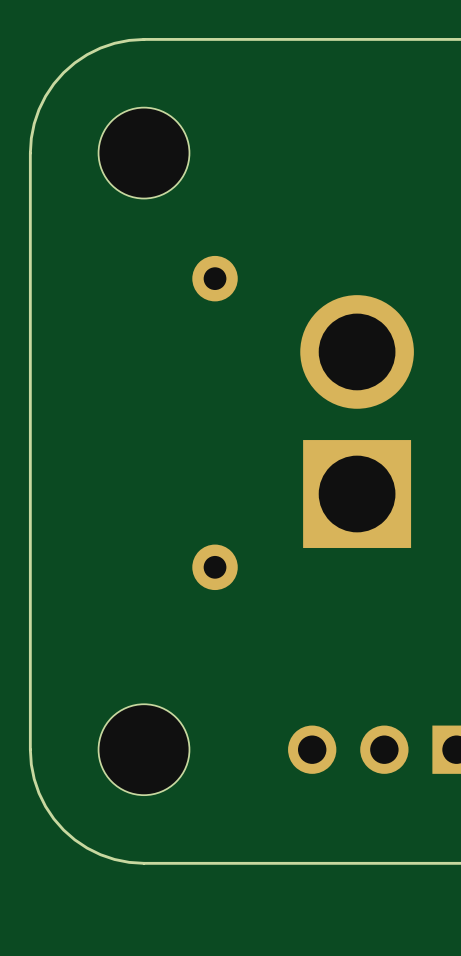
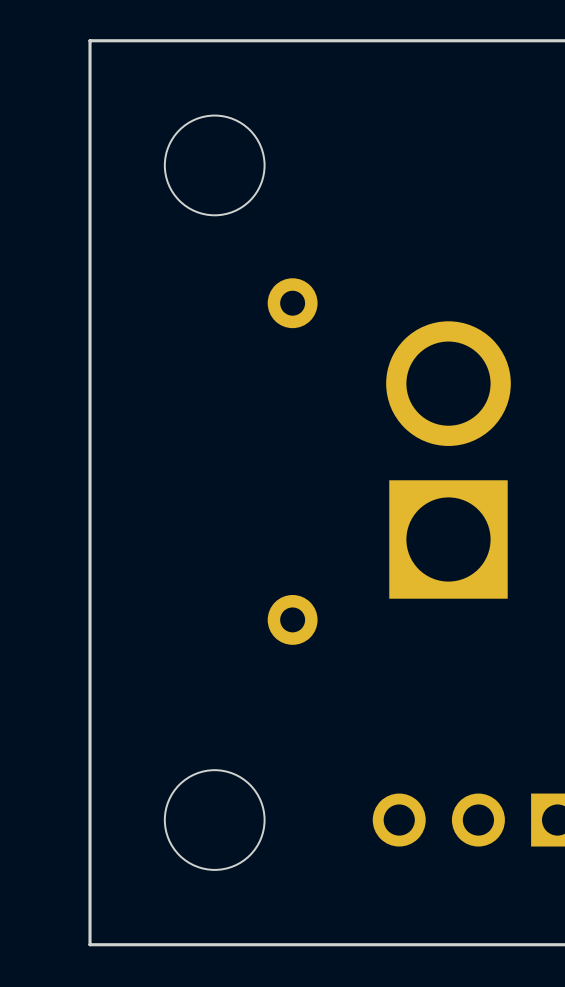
board edge: (144, 39) (114, 43) (100, 48) (74, 62) (63, 72) (53, 83) (39, 109) (34, 123) (30, 153) -> (214, 40) (90, 40) (90, 165)
board edge: (30, 749) (34, 779) (39, 793) (53, 818) (63, 830) (74, 839) (100, 854) (114, 859) (144, 863) -> (90, 820) (90, 944) (214, 944)

